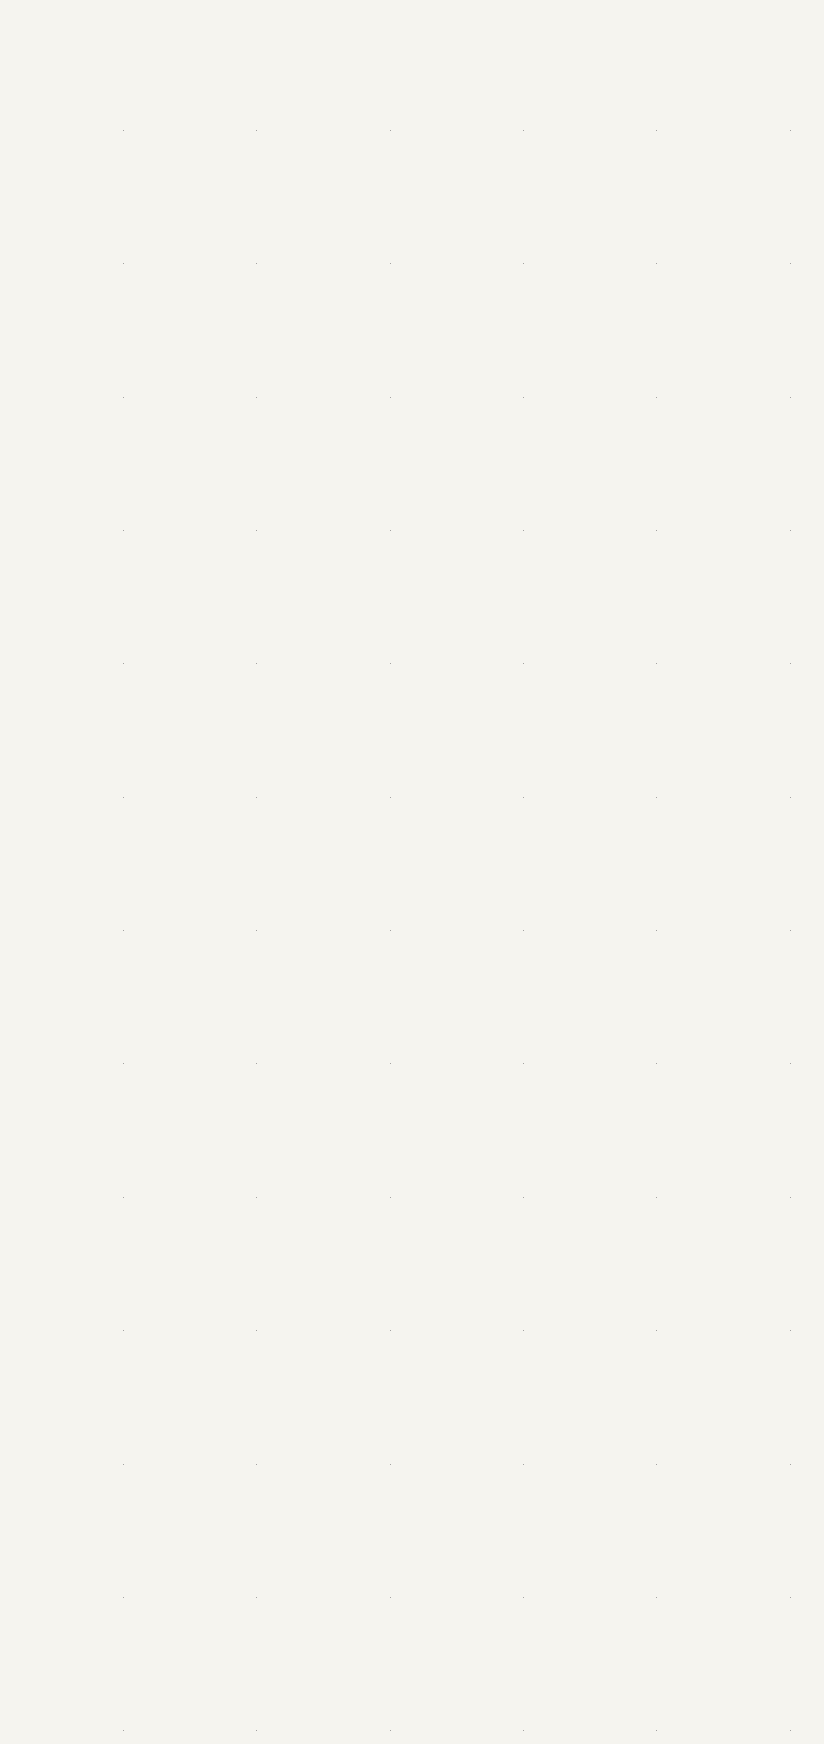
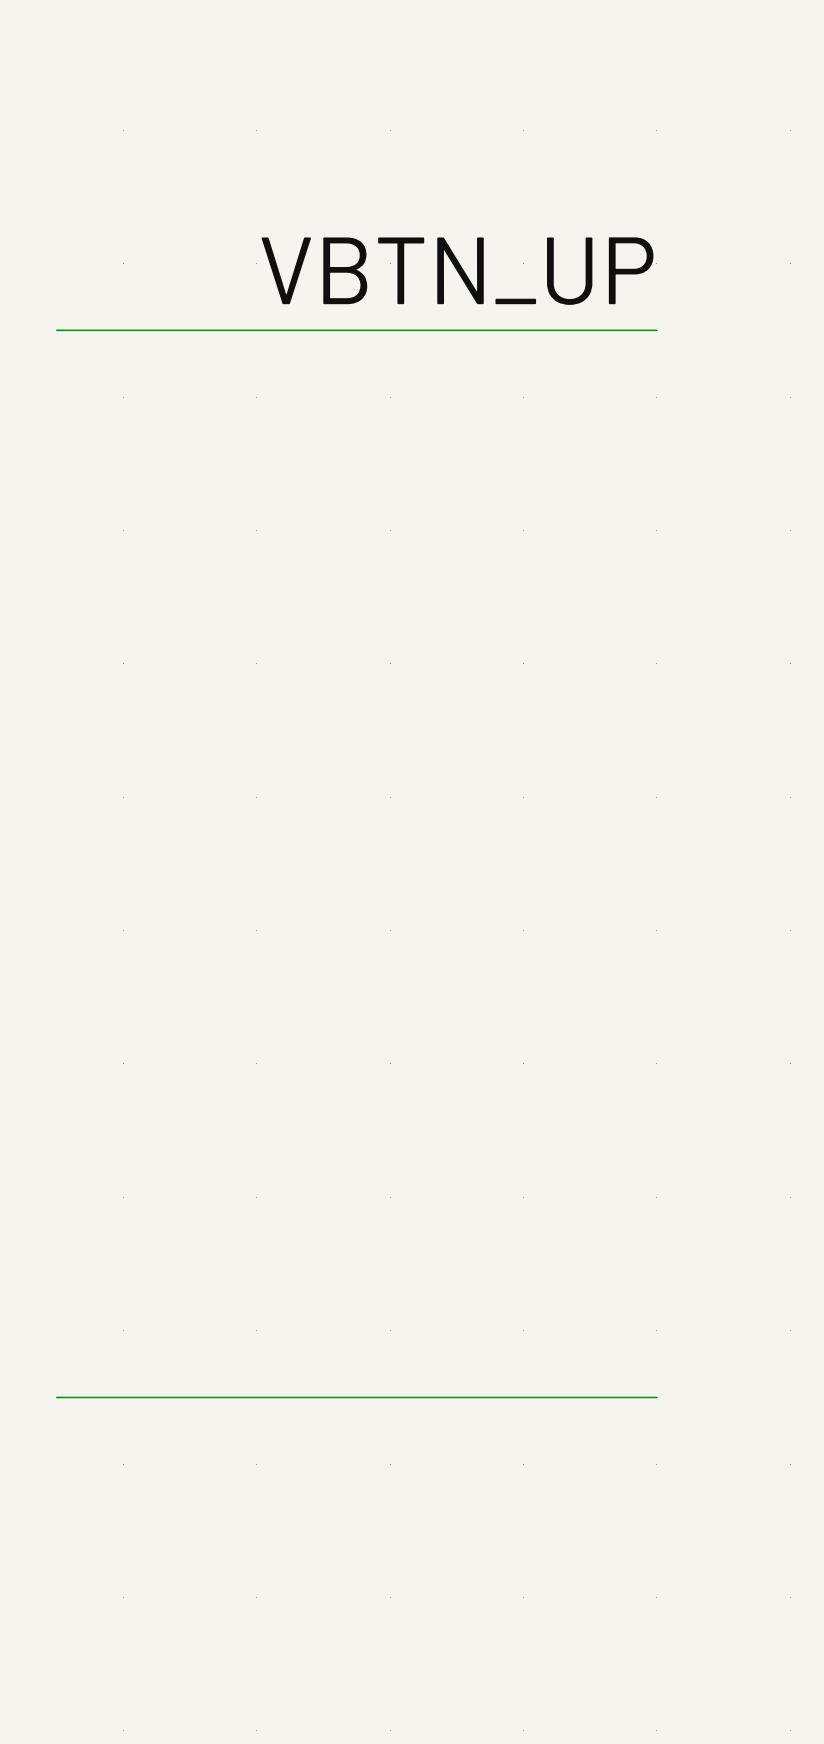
label: none -> VBTN_UP (457, 271)
wire: none -> (56, 330) (656, 330)
wire: none -> (56, 1397) (656, 1397)

